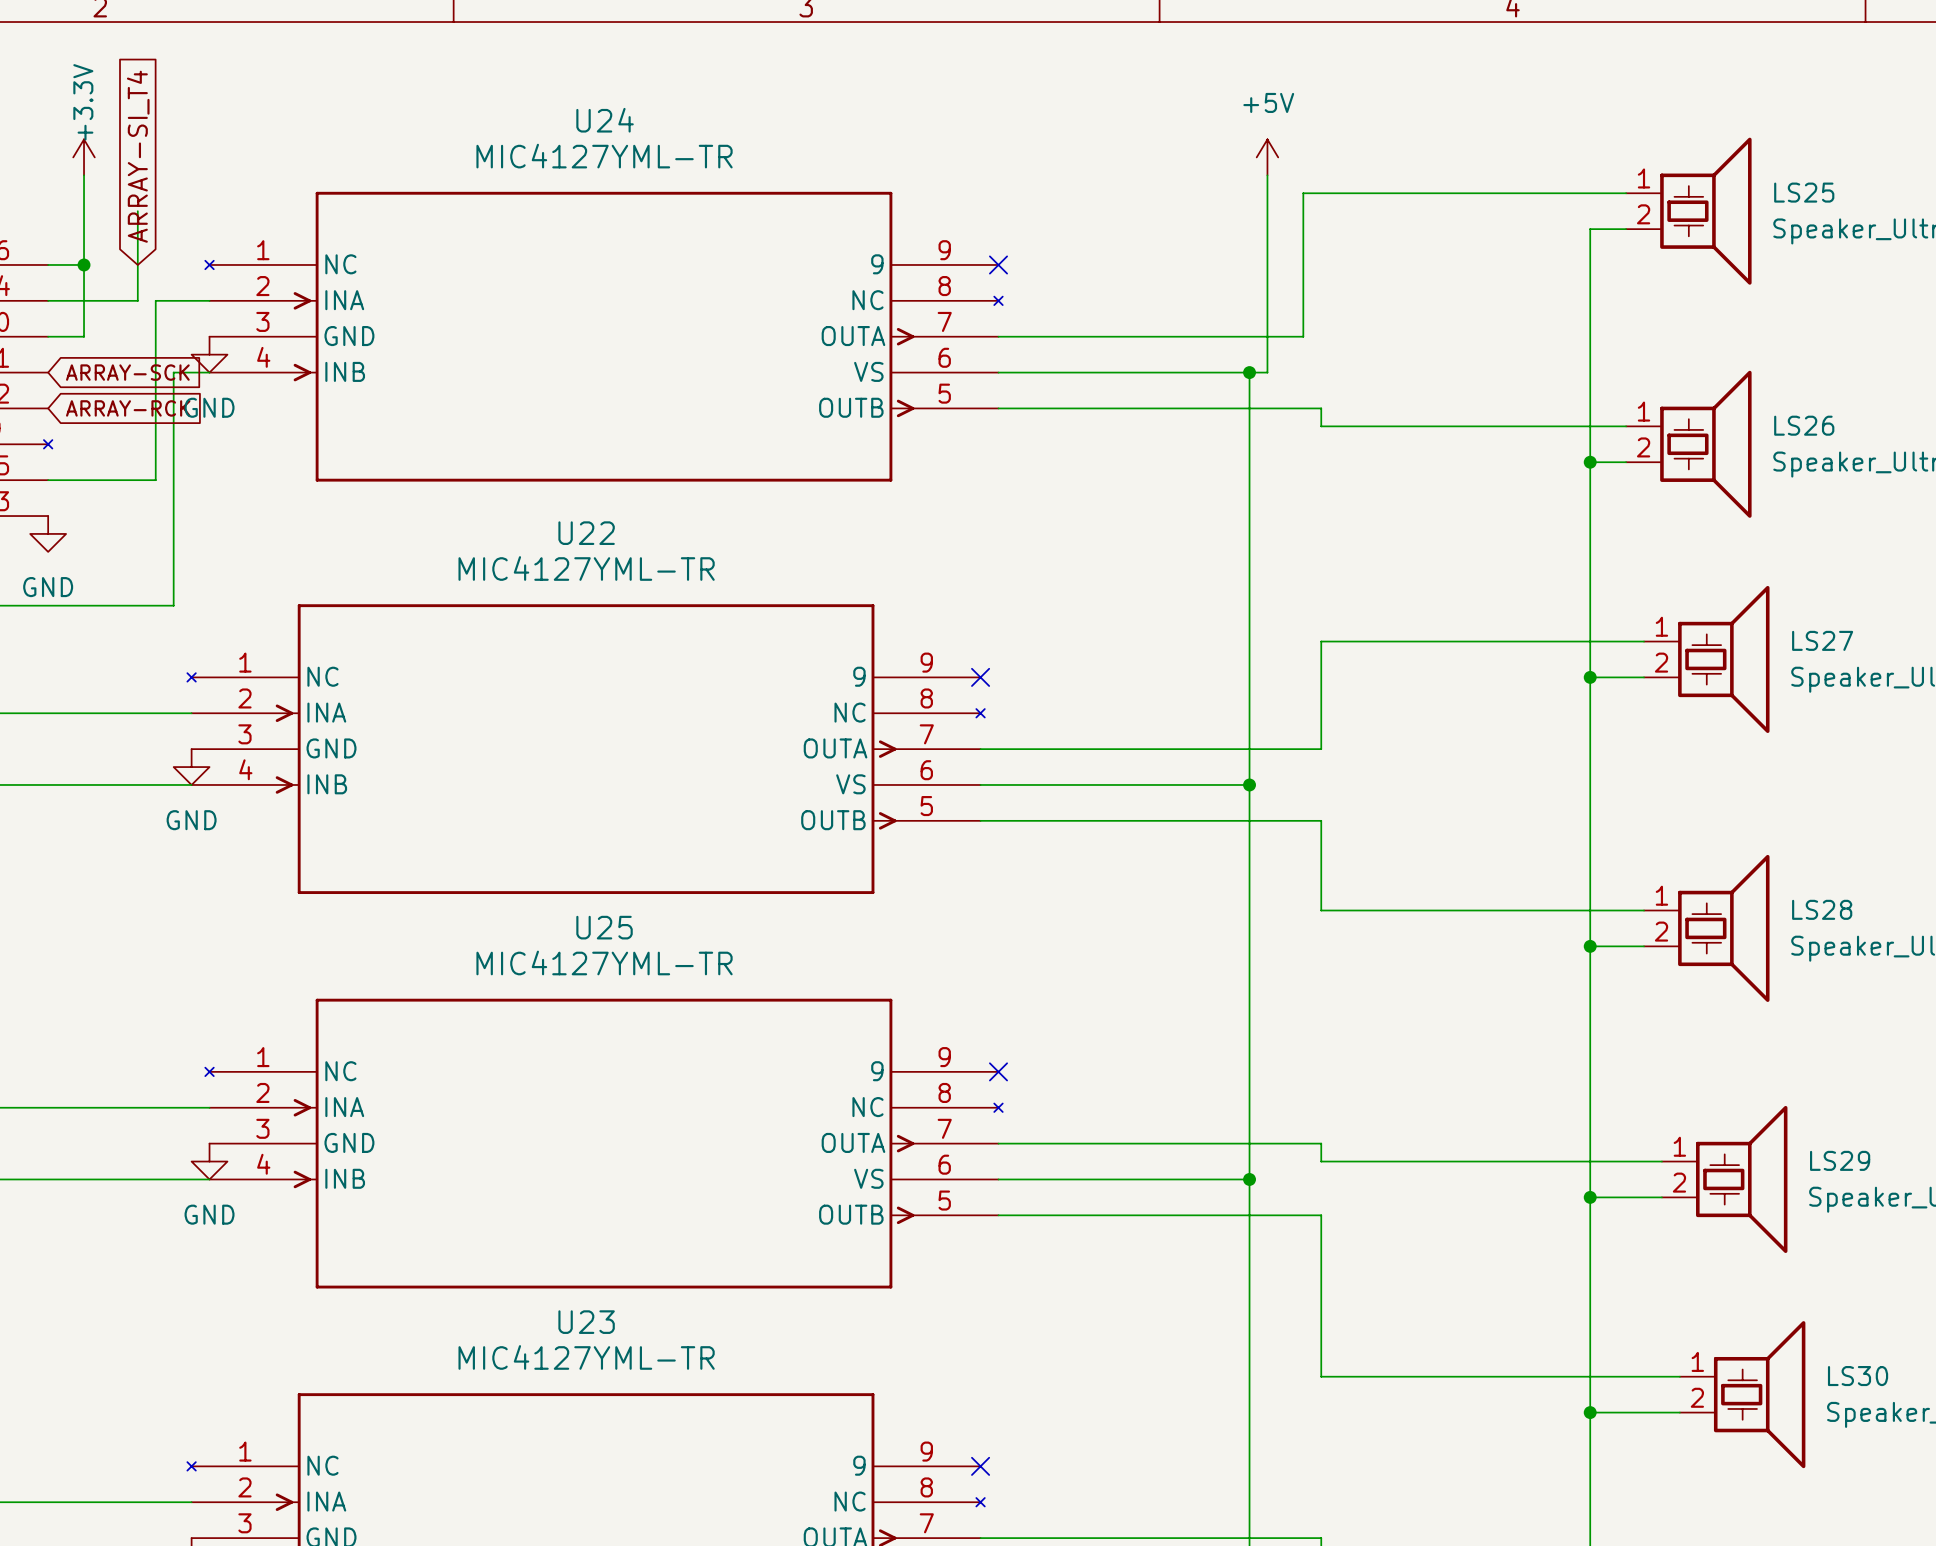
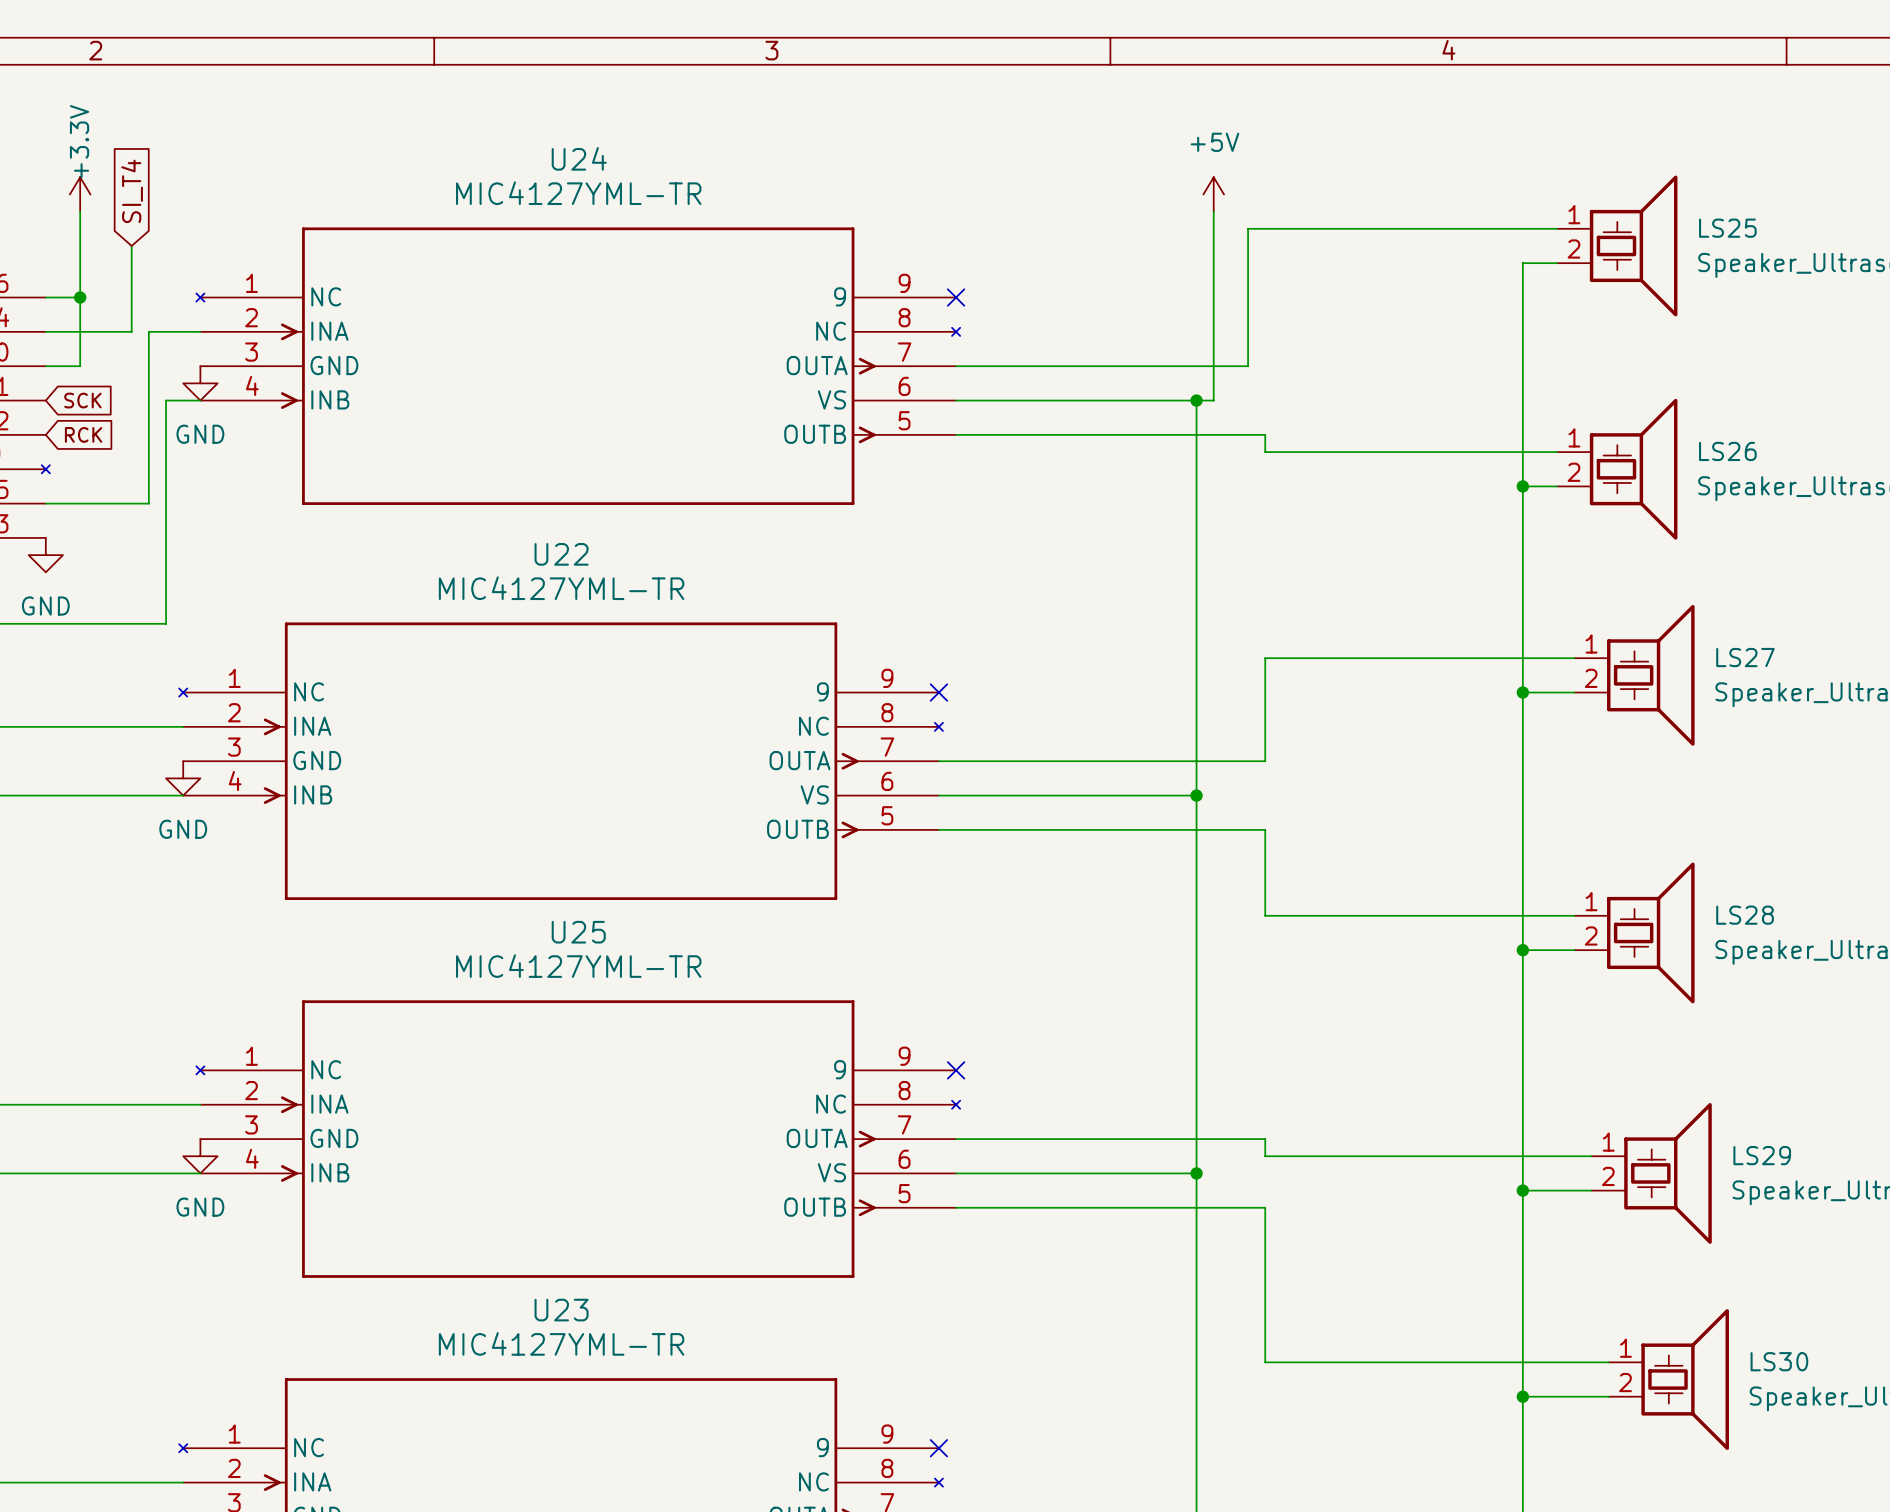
global label: ARRAY-SI_T4 (138, 156) -> SI_T4 (132, 191)
global label: ARRAY-SCK (127, 372) -> SCK (82, 400)
global label: ARRAY-RCK (128, 408) -> RCK (83, 434)

